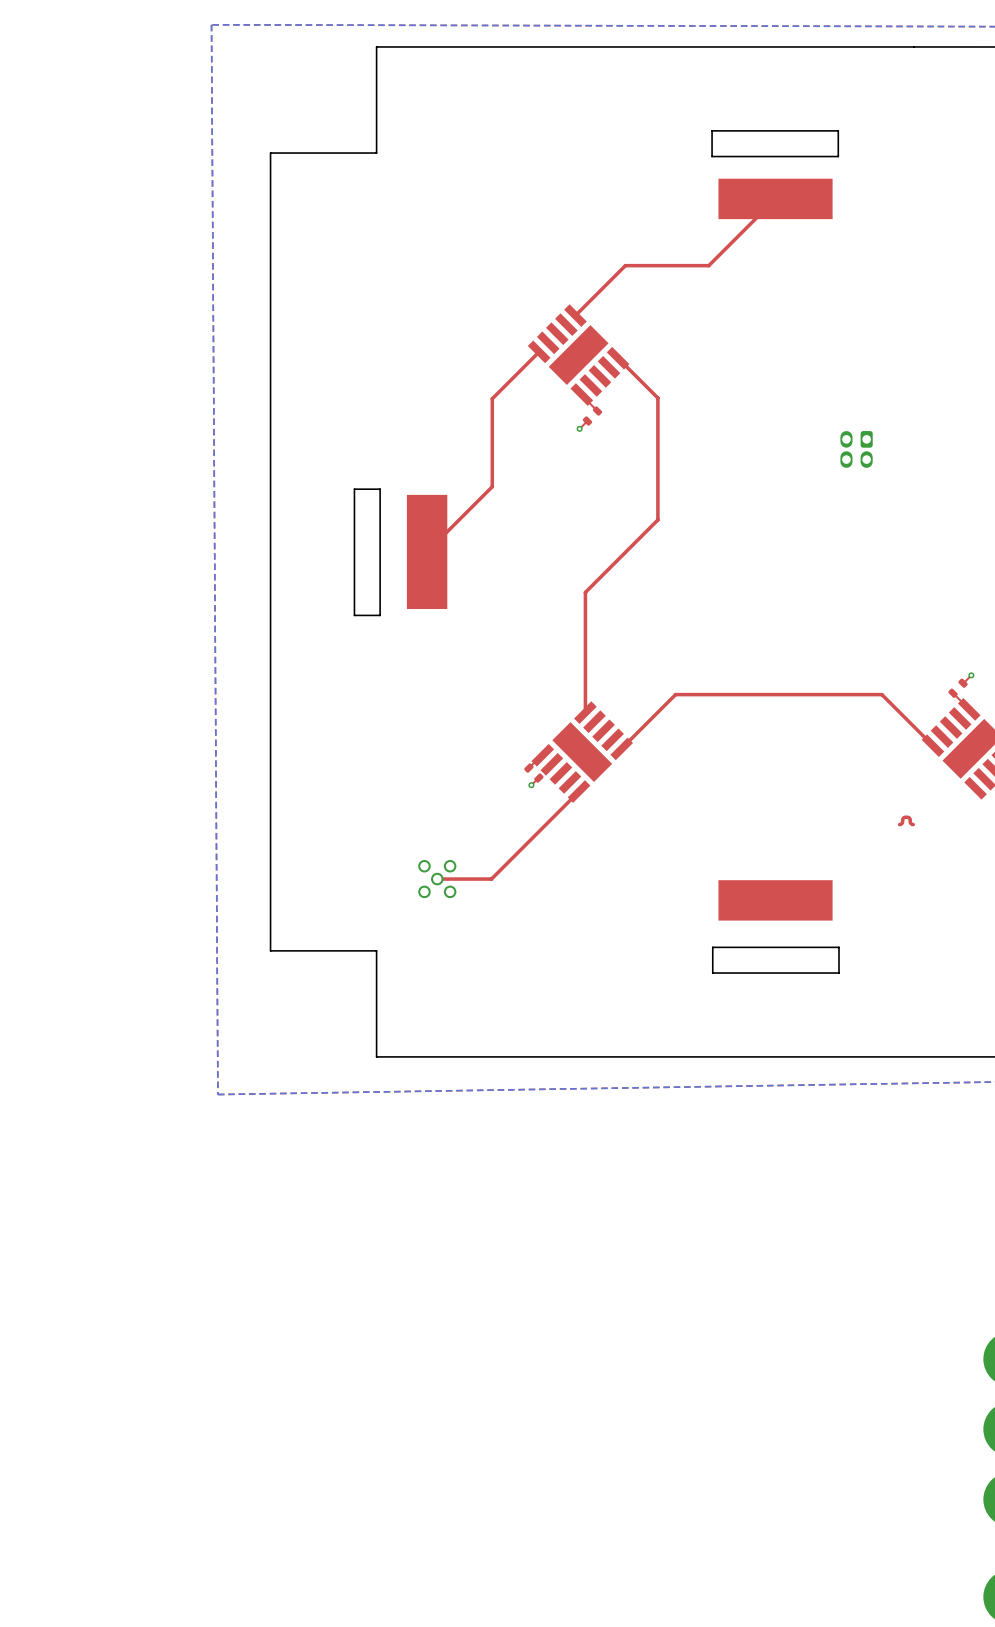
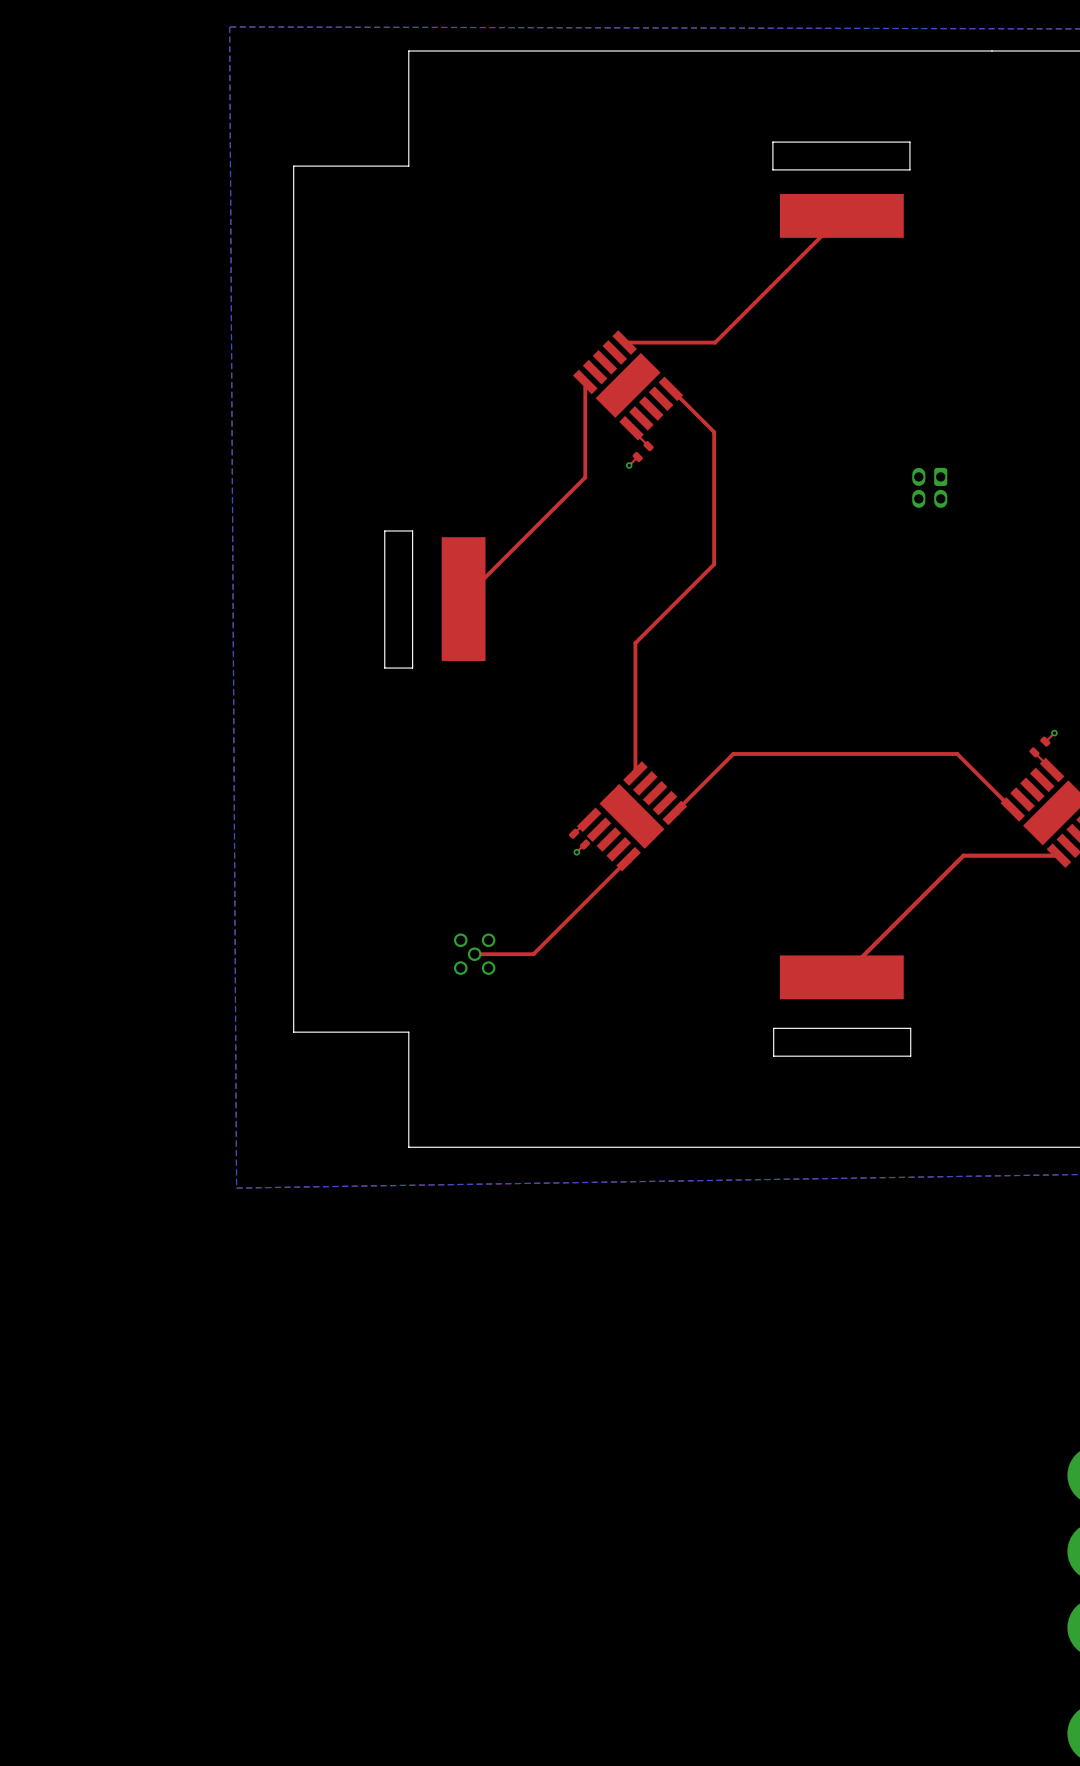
top track: (708, 265) (625, 265) (575, 315) -> (769, 288) (715, 342) (624, 342)
top track: (539, 351) (492, 398) (492, 486) -> (585, 381) (585, 477) (534, 528)
top track: none -> (1058, 855) (963, 855) (841, 977)
top track: (905, 817) (902, 820) -> none
top track: (907, 817) (910, 820) -> none
top track: (902, 821) (899, 824) -> none
top track: (910, 821) (913, 824) -> none

